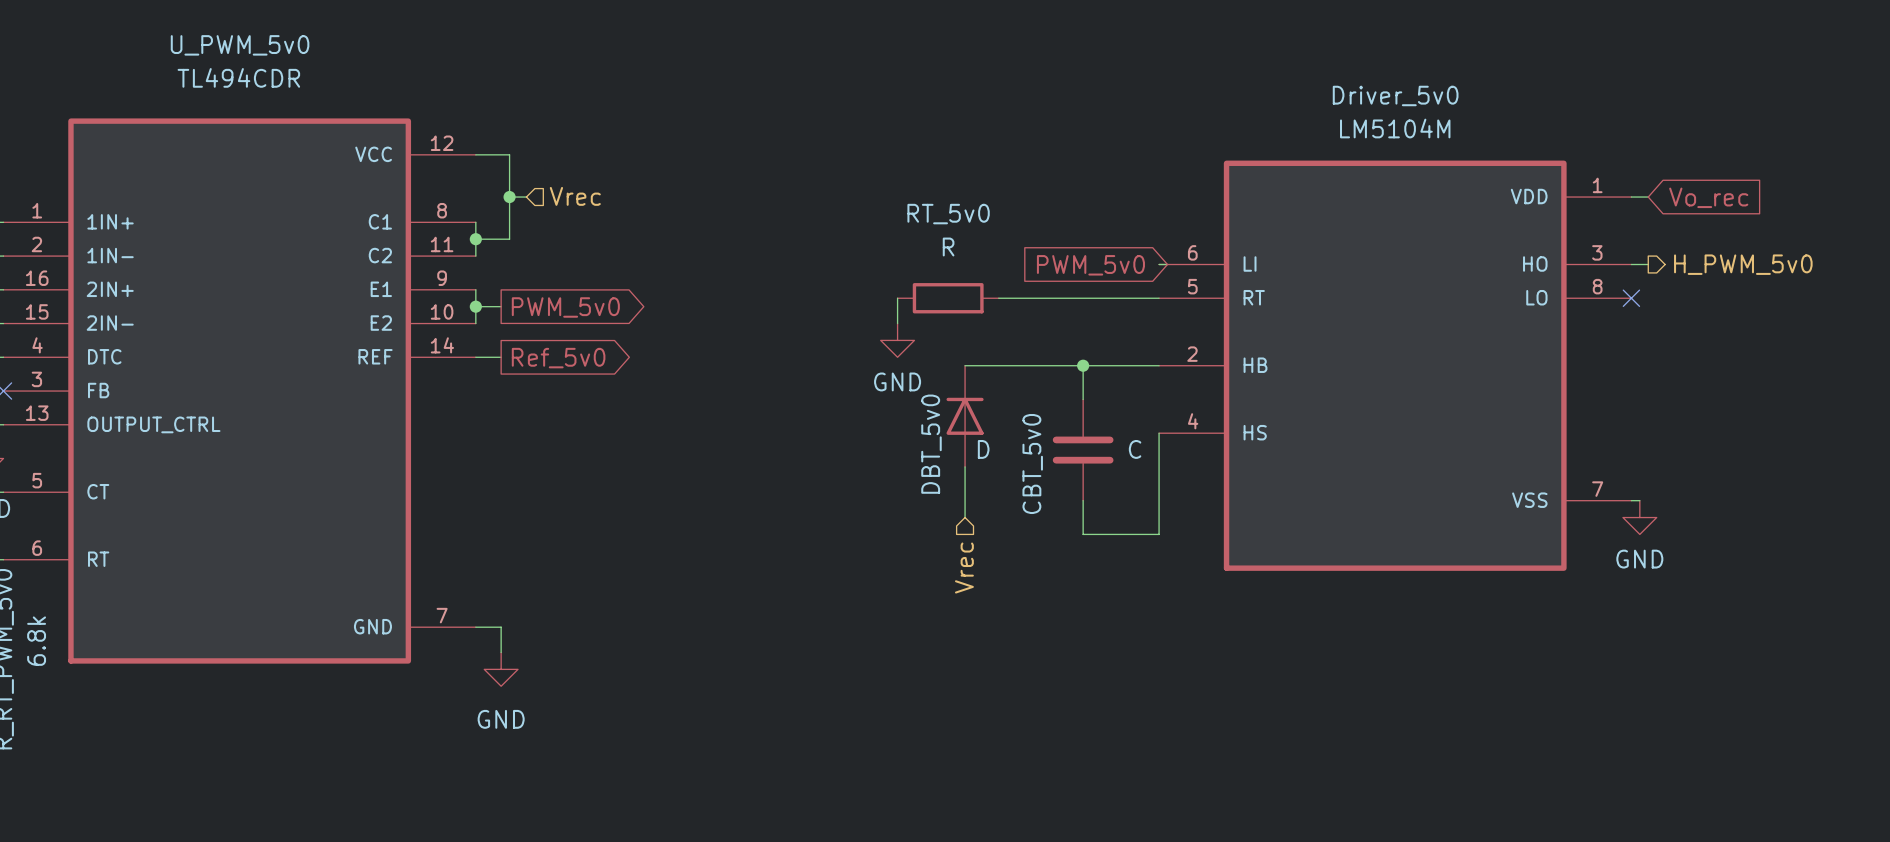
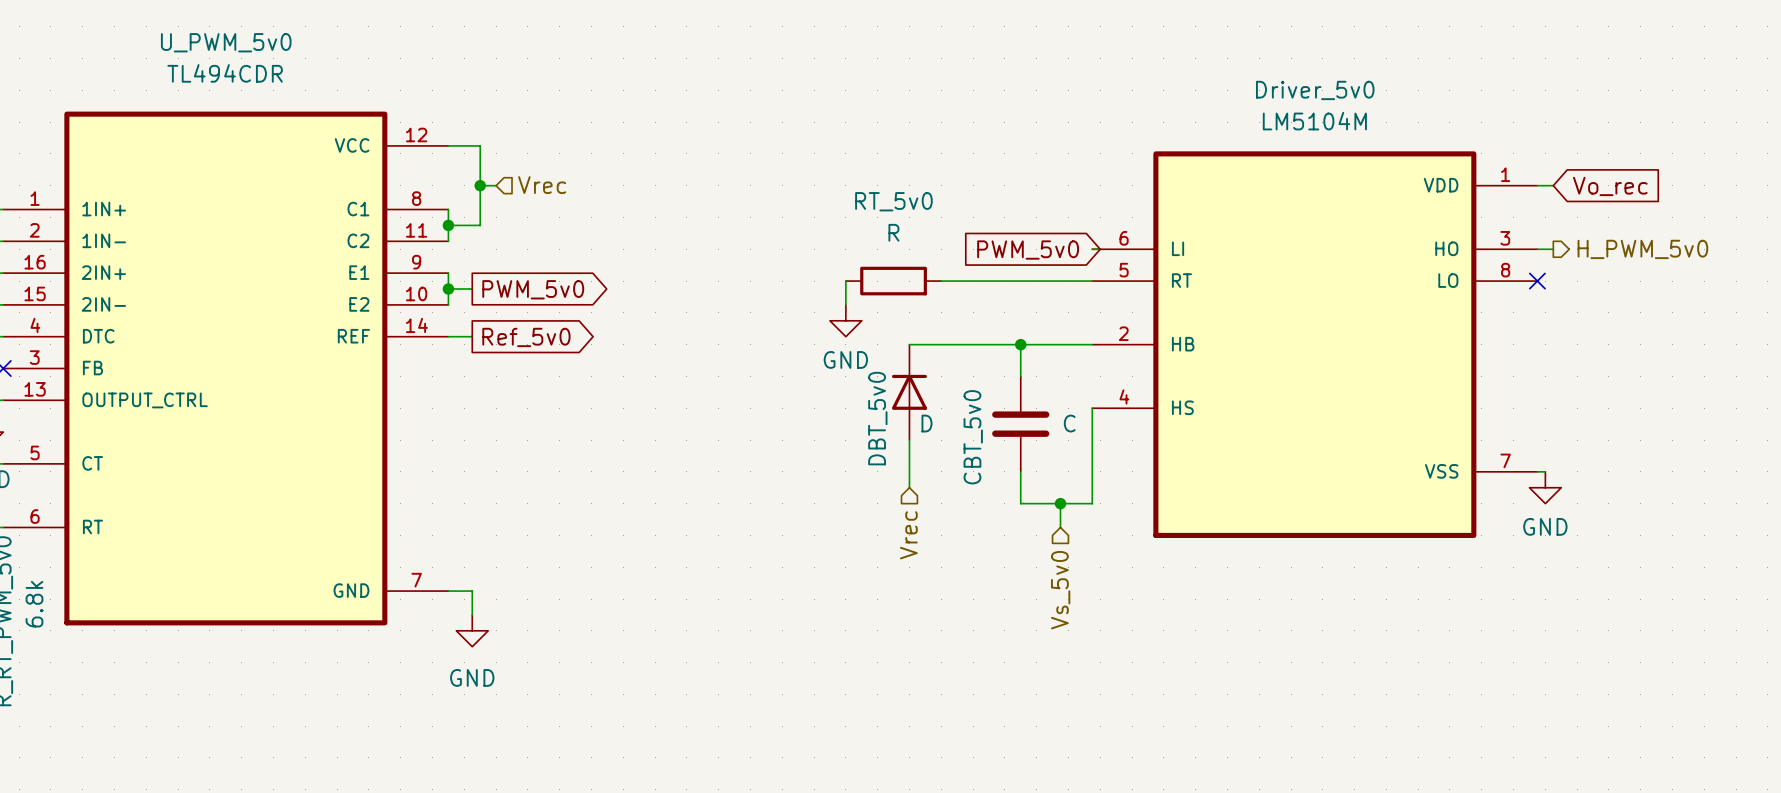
wire: none -> (1060, 503) (1060, 527)
junction: none -> (1060, 503)
hierarchical label: none -> Vs_5v0 (1060, 590)

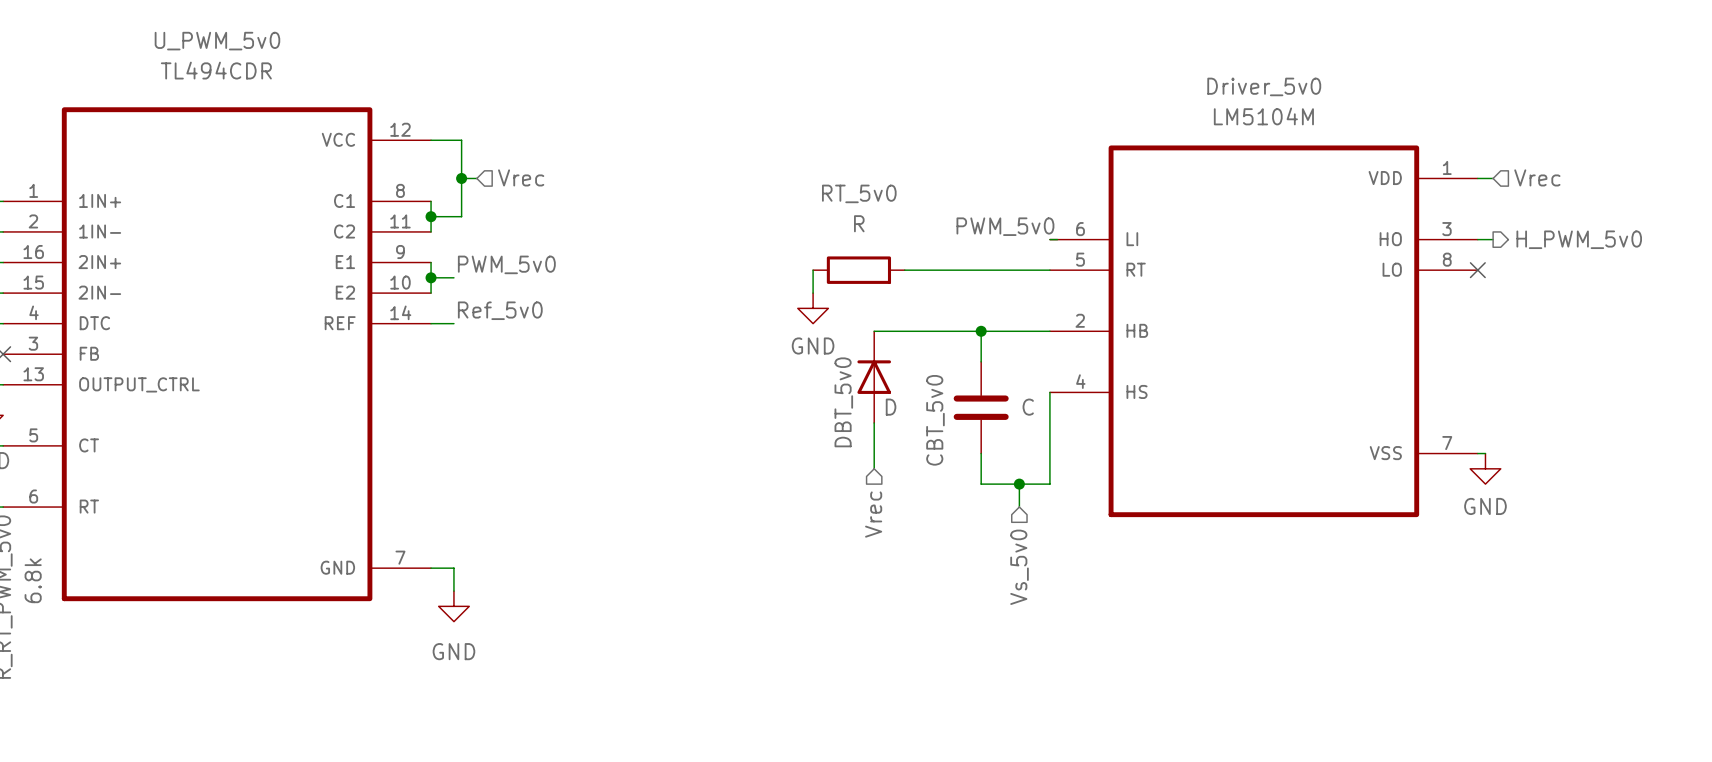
hierarchical label: none -> Vrec (1537, 177)
global label: Vo_rec (1610, 186) -> none
label: none -> PWM_5v0 (1005, 226)
global label: PWM_5v0 (1028, 250) -> none
label: none -> PWM_5v0 (506, 264)
global label: PWM_5v0 (533, 289) -> none
label: none -> Ref_5v0 (500, 310)
global label: Ref_5v0 (526, 337) -> none

